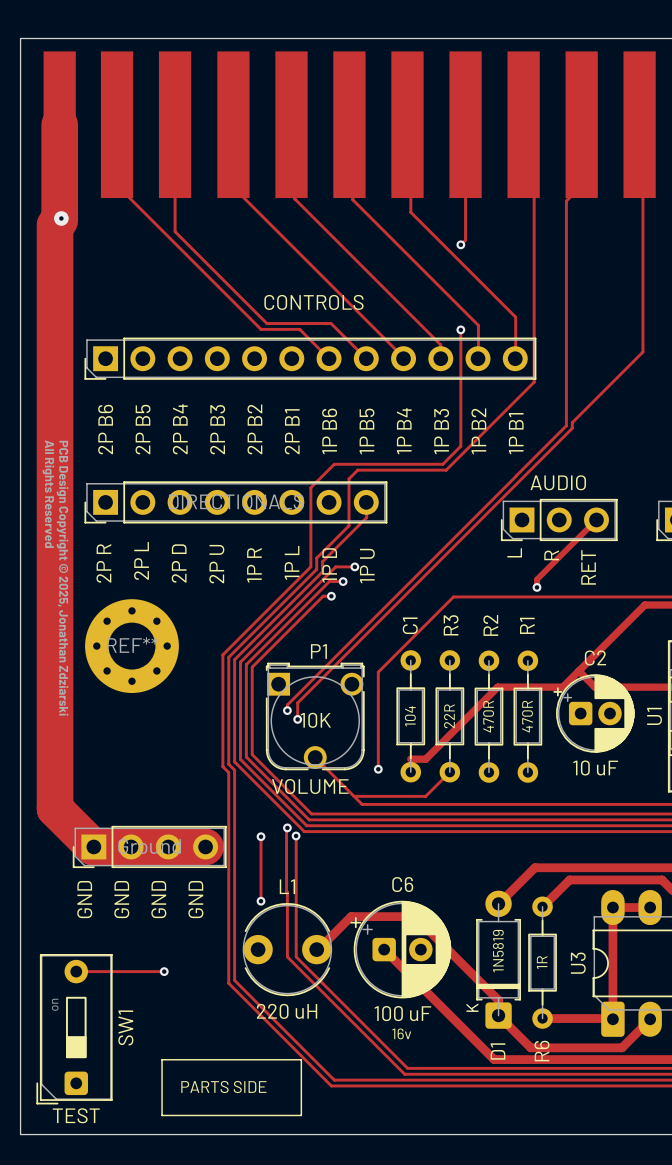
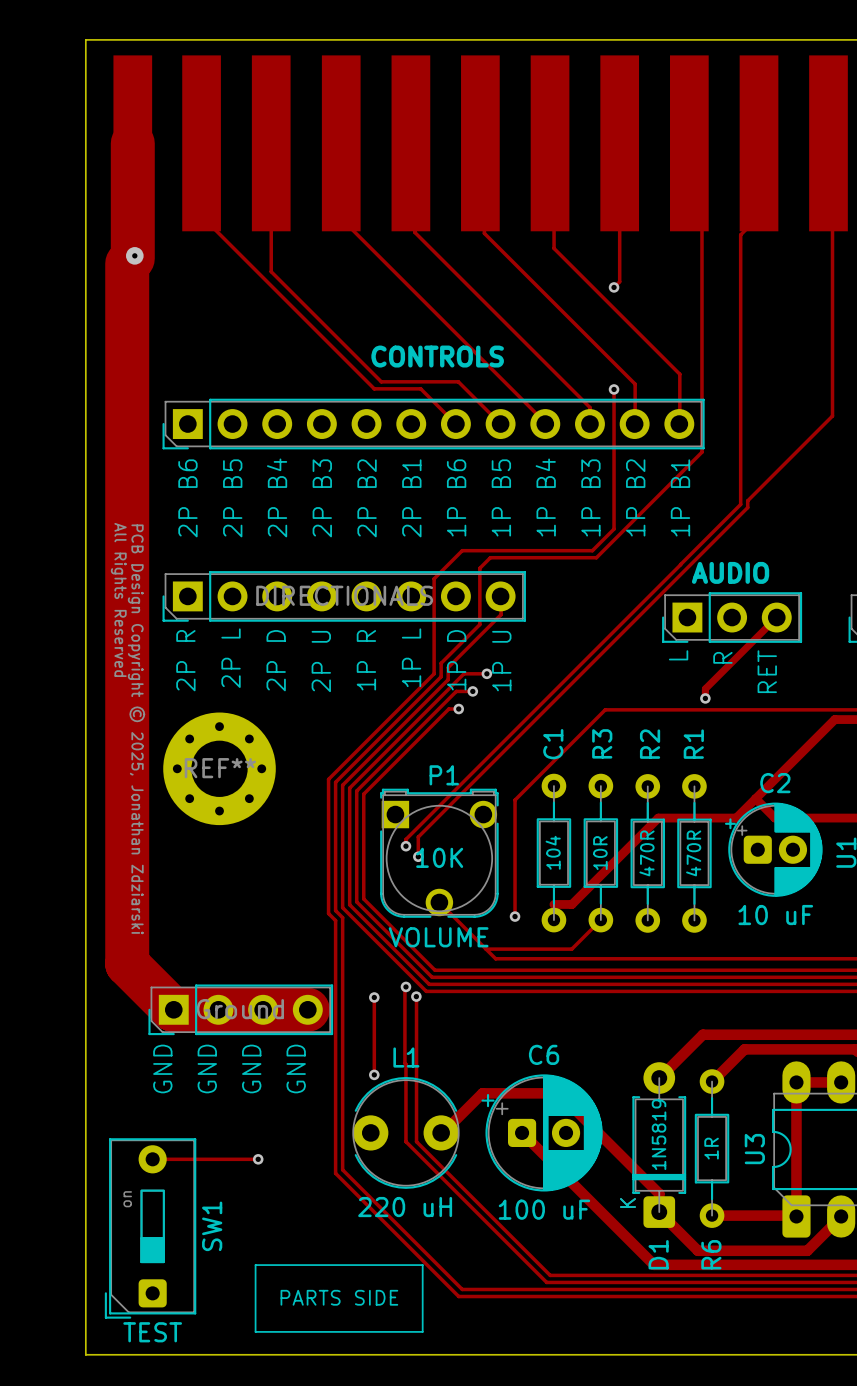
R3 value: 22R (449, 716) -> 10R (600, 853)
text: 16v (401, 1033) -> none

